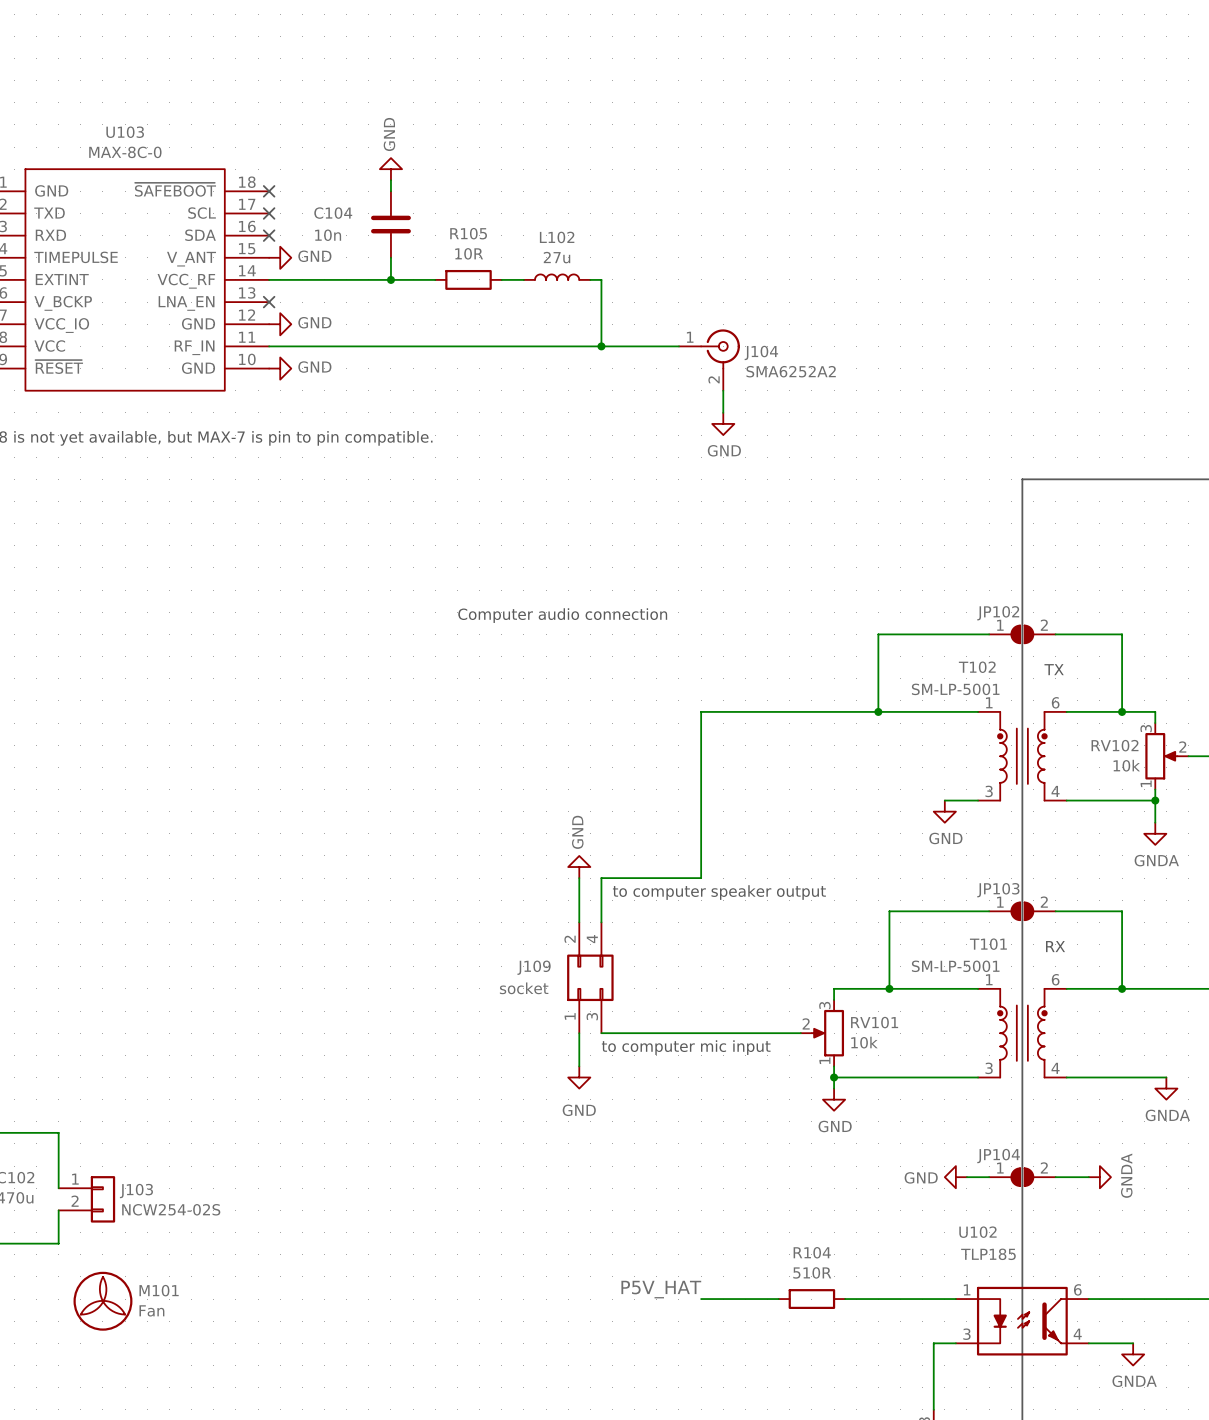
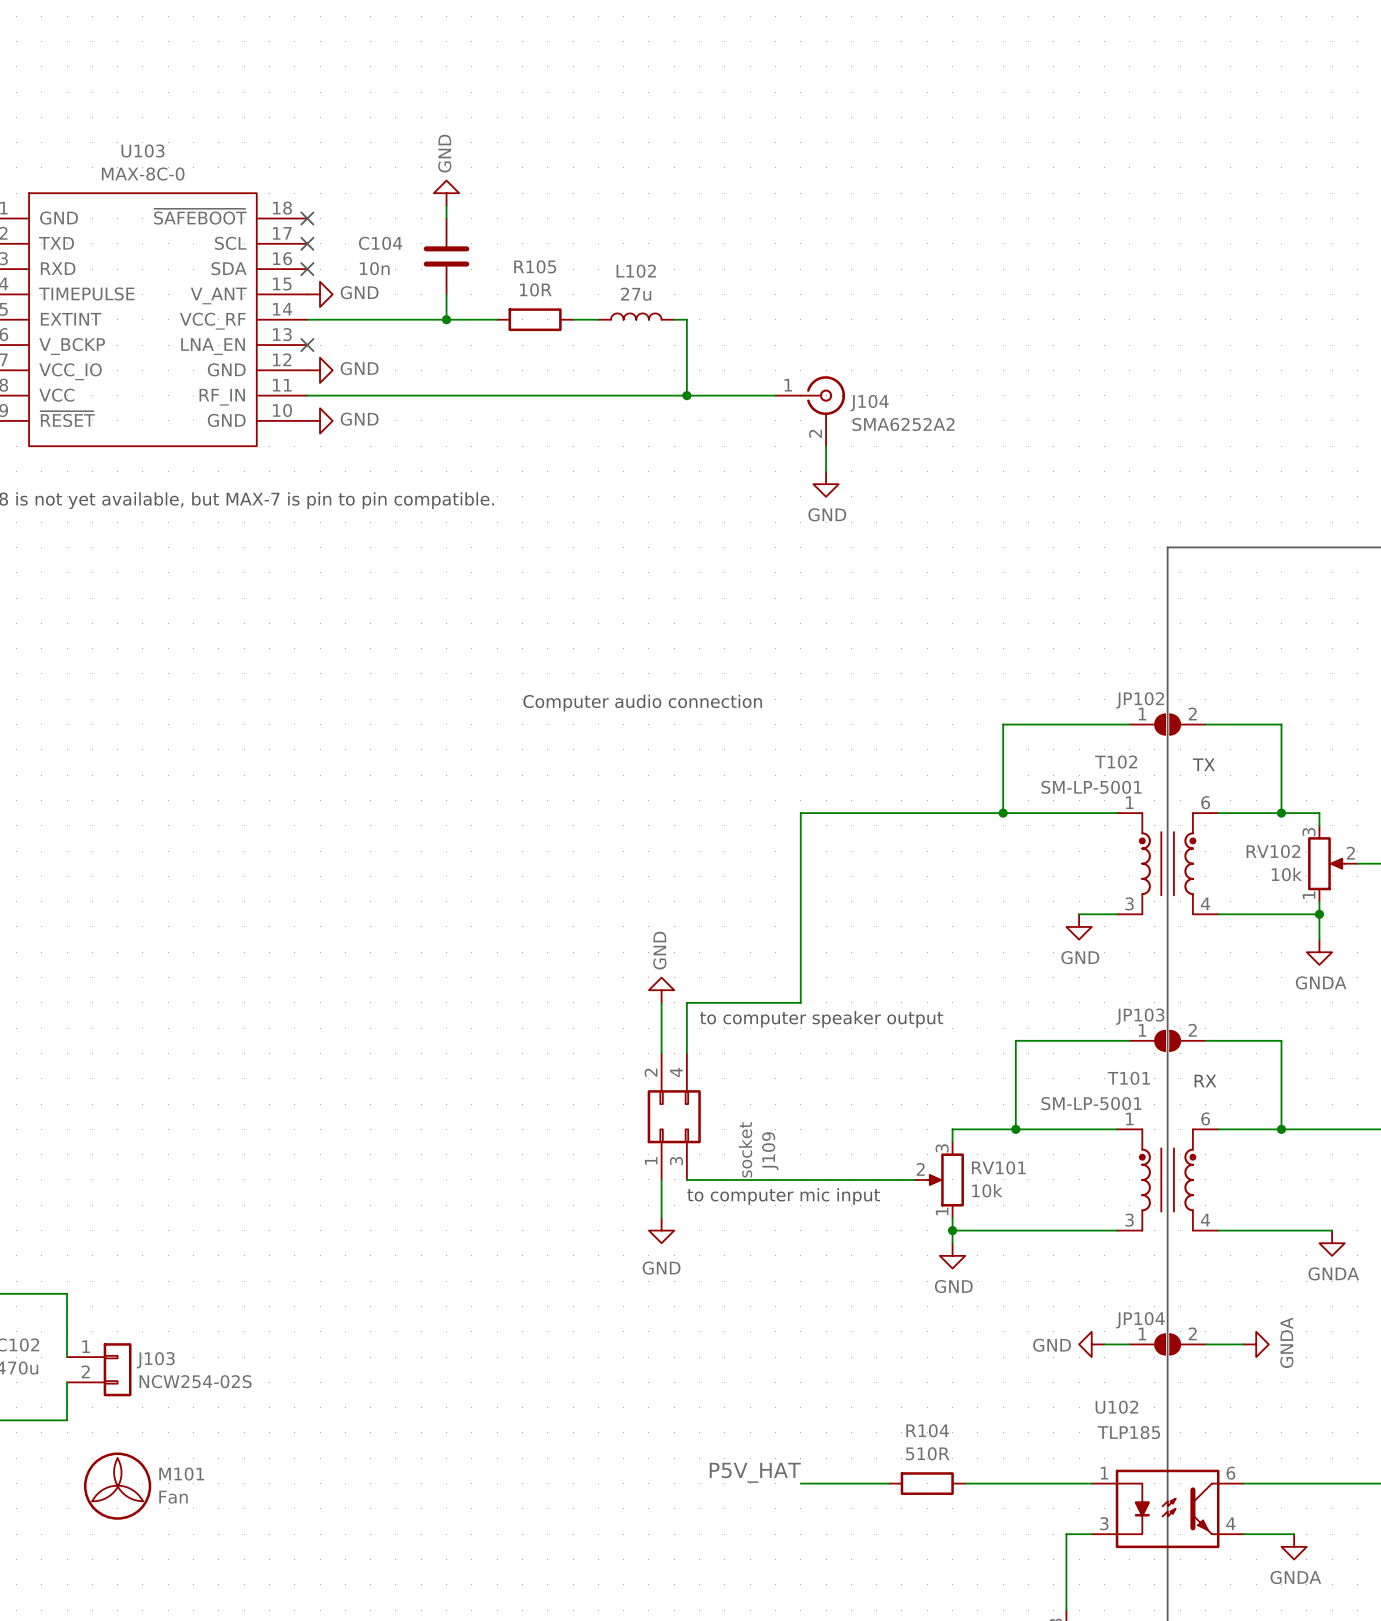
J109 name rotation: 0° (534, 967) -> 90° counterclockwise (770, 1151)
J109 name position: J109 (534, 967) -> J109 (770, 1151)
J109 value rotation: 0° (524, 988) -> 90° counterclockwise (745, 1149)
J109 value position: socket (524, 988) -> socket (745, 1149)

